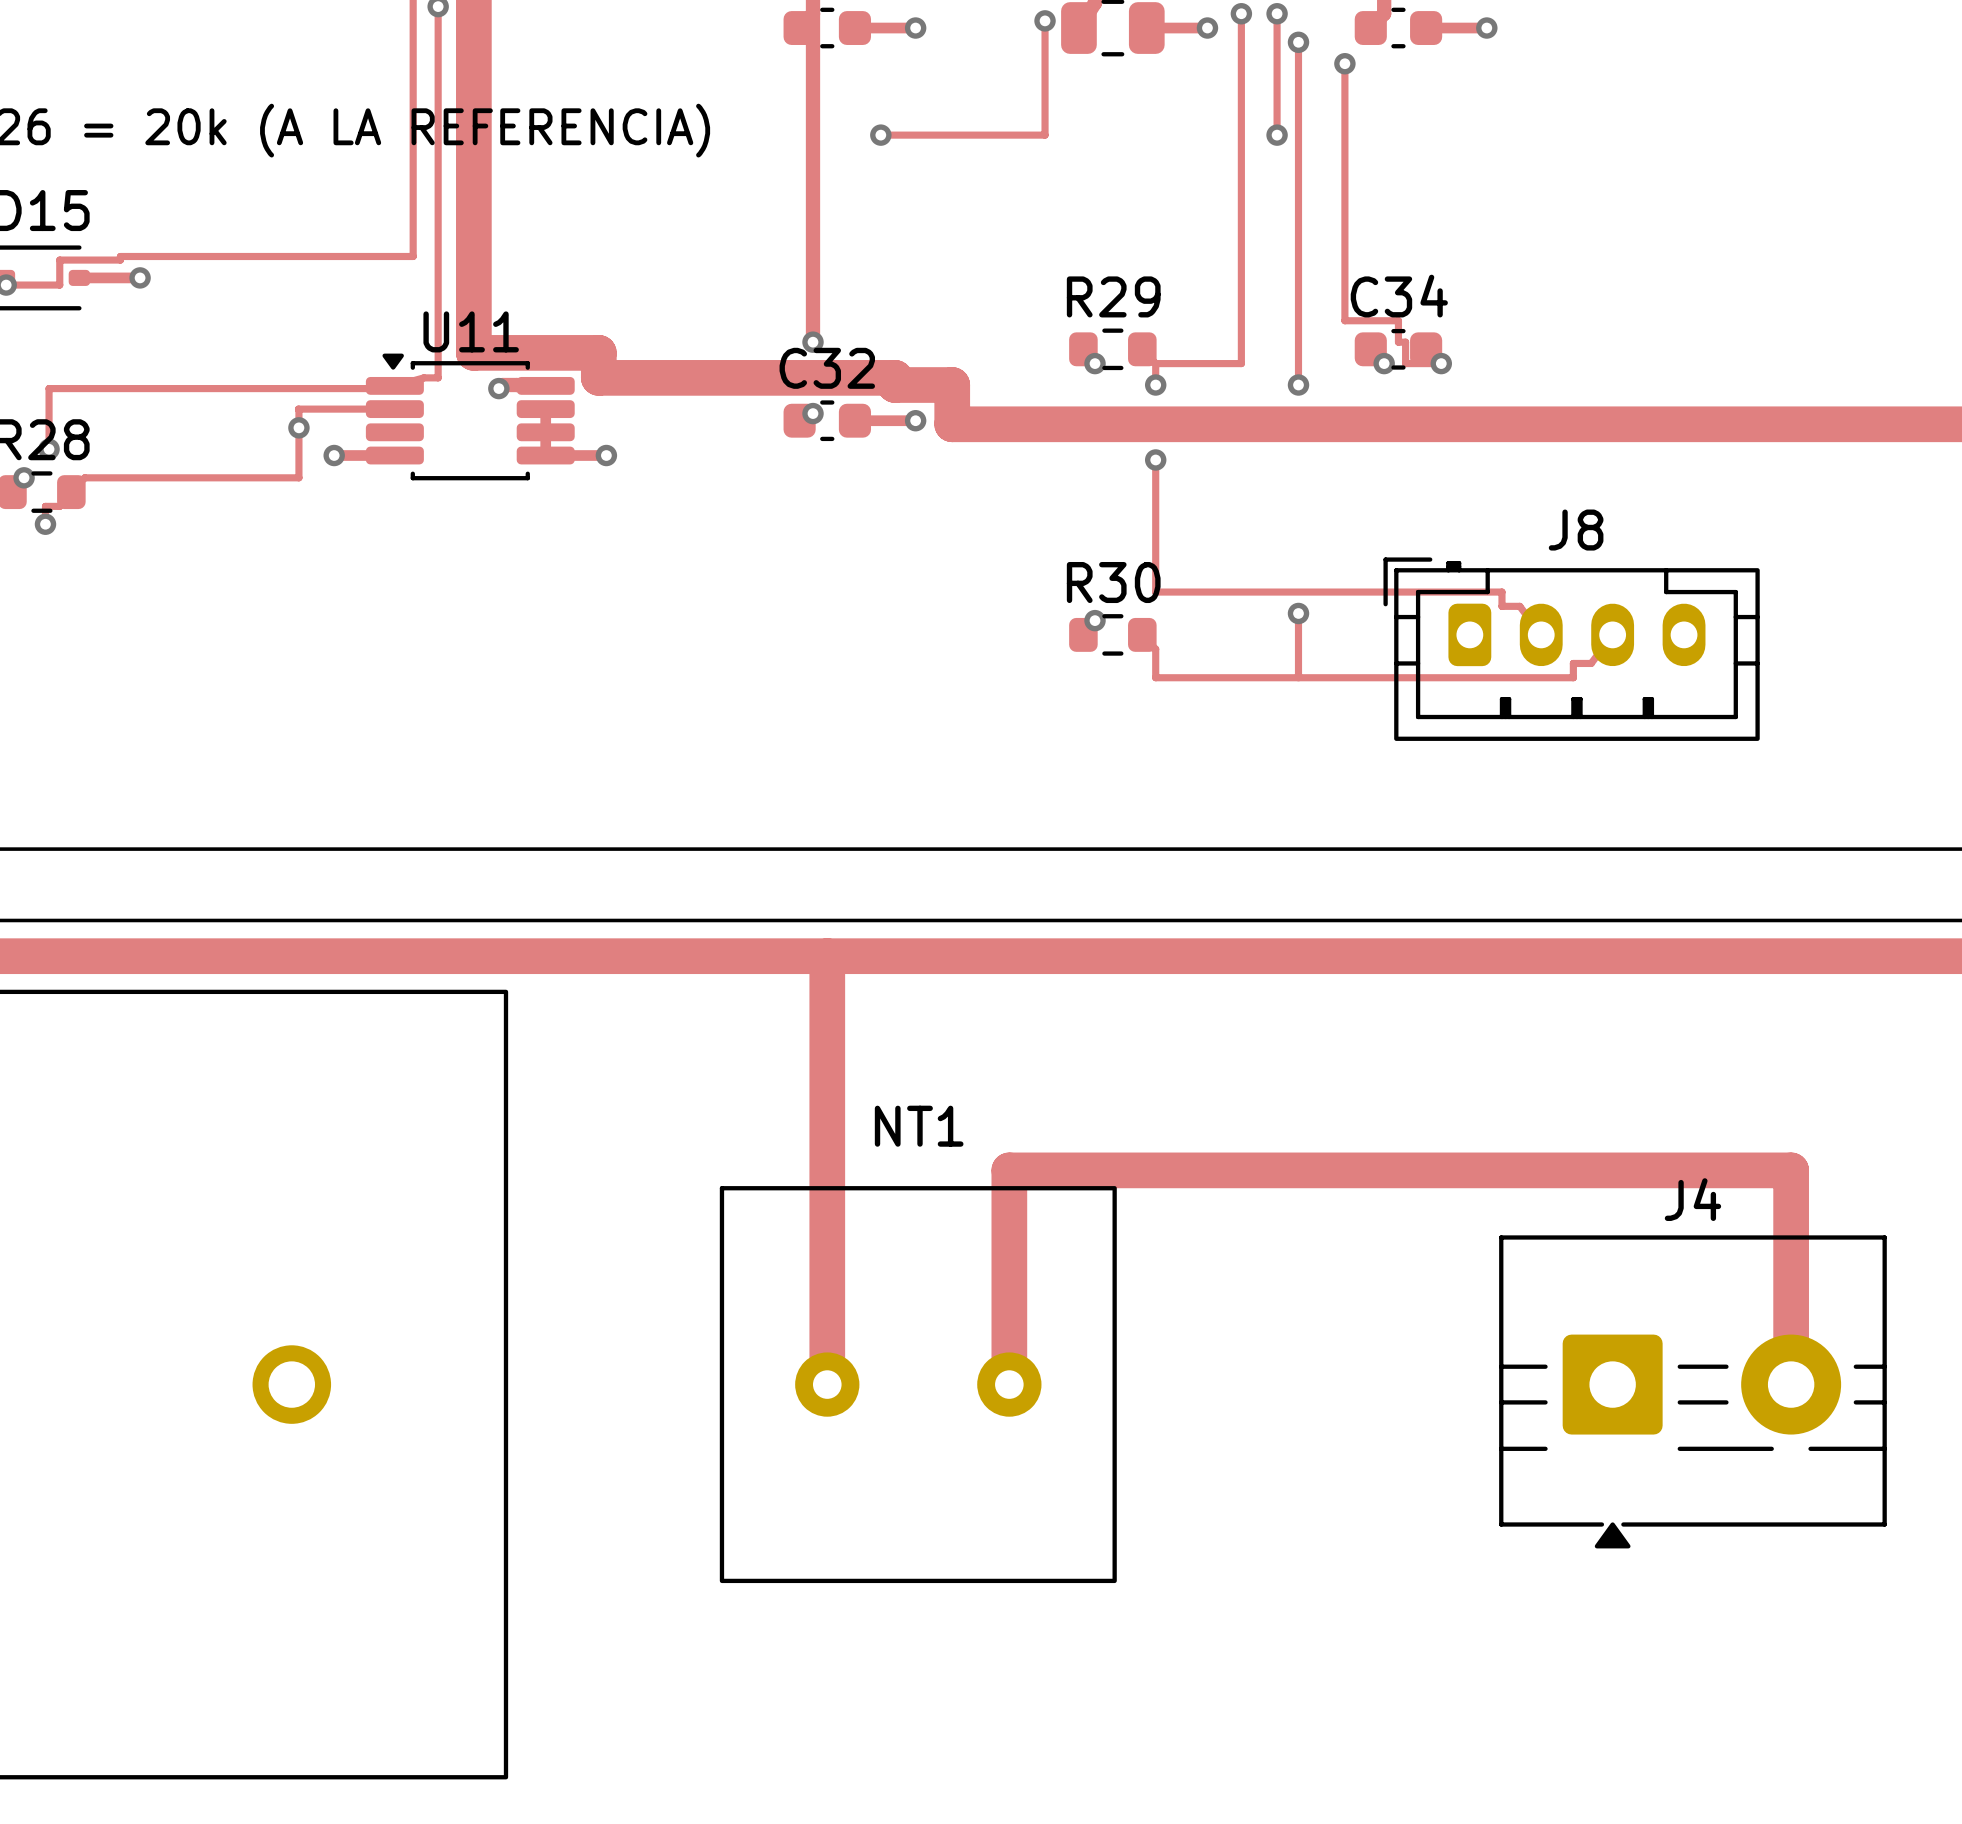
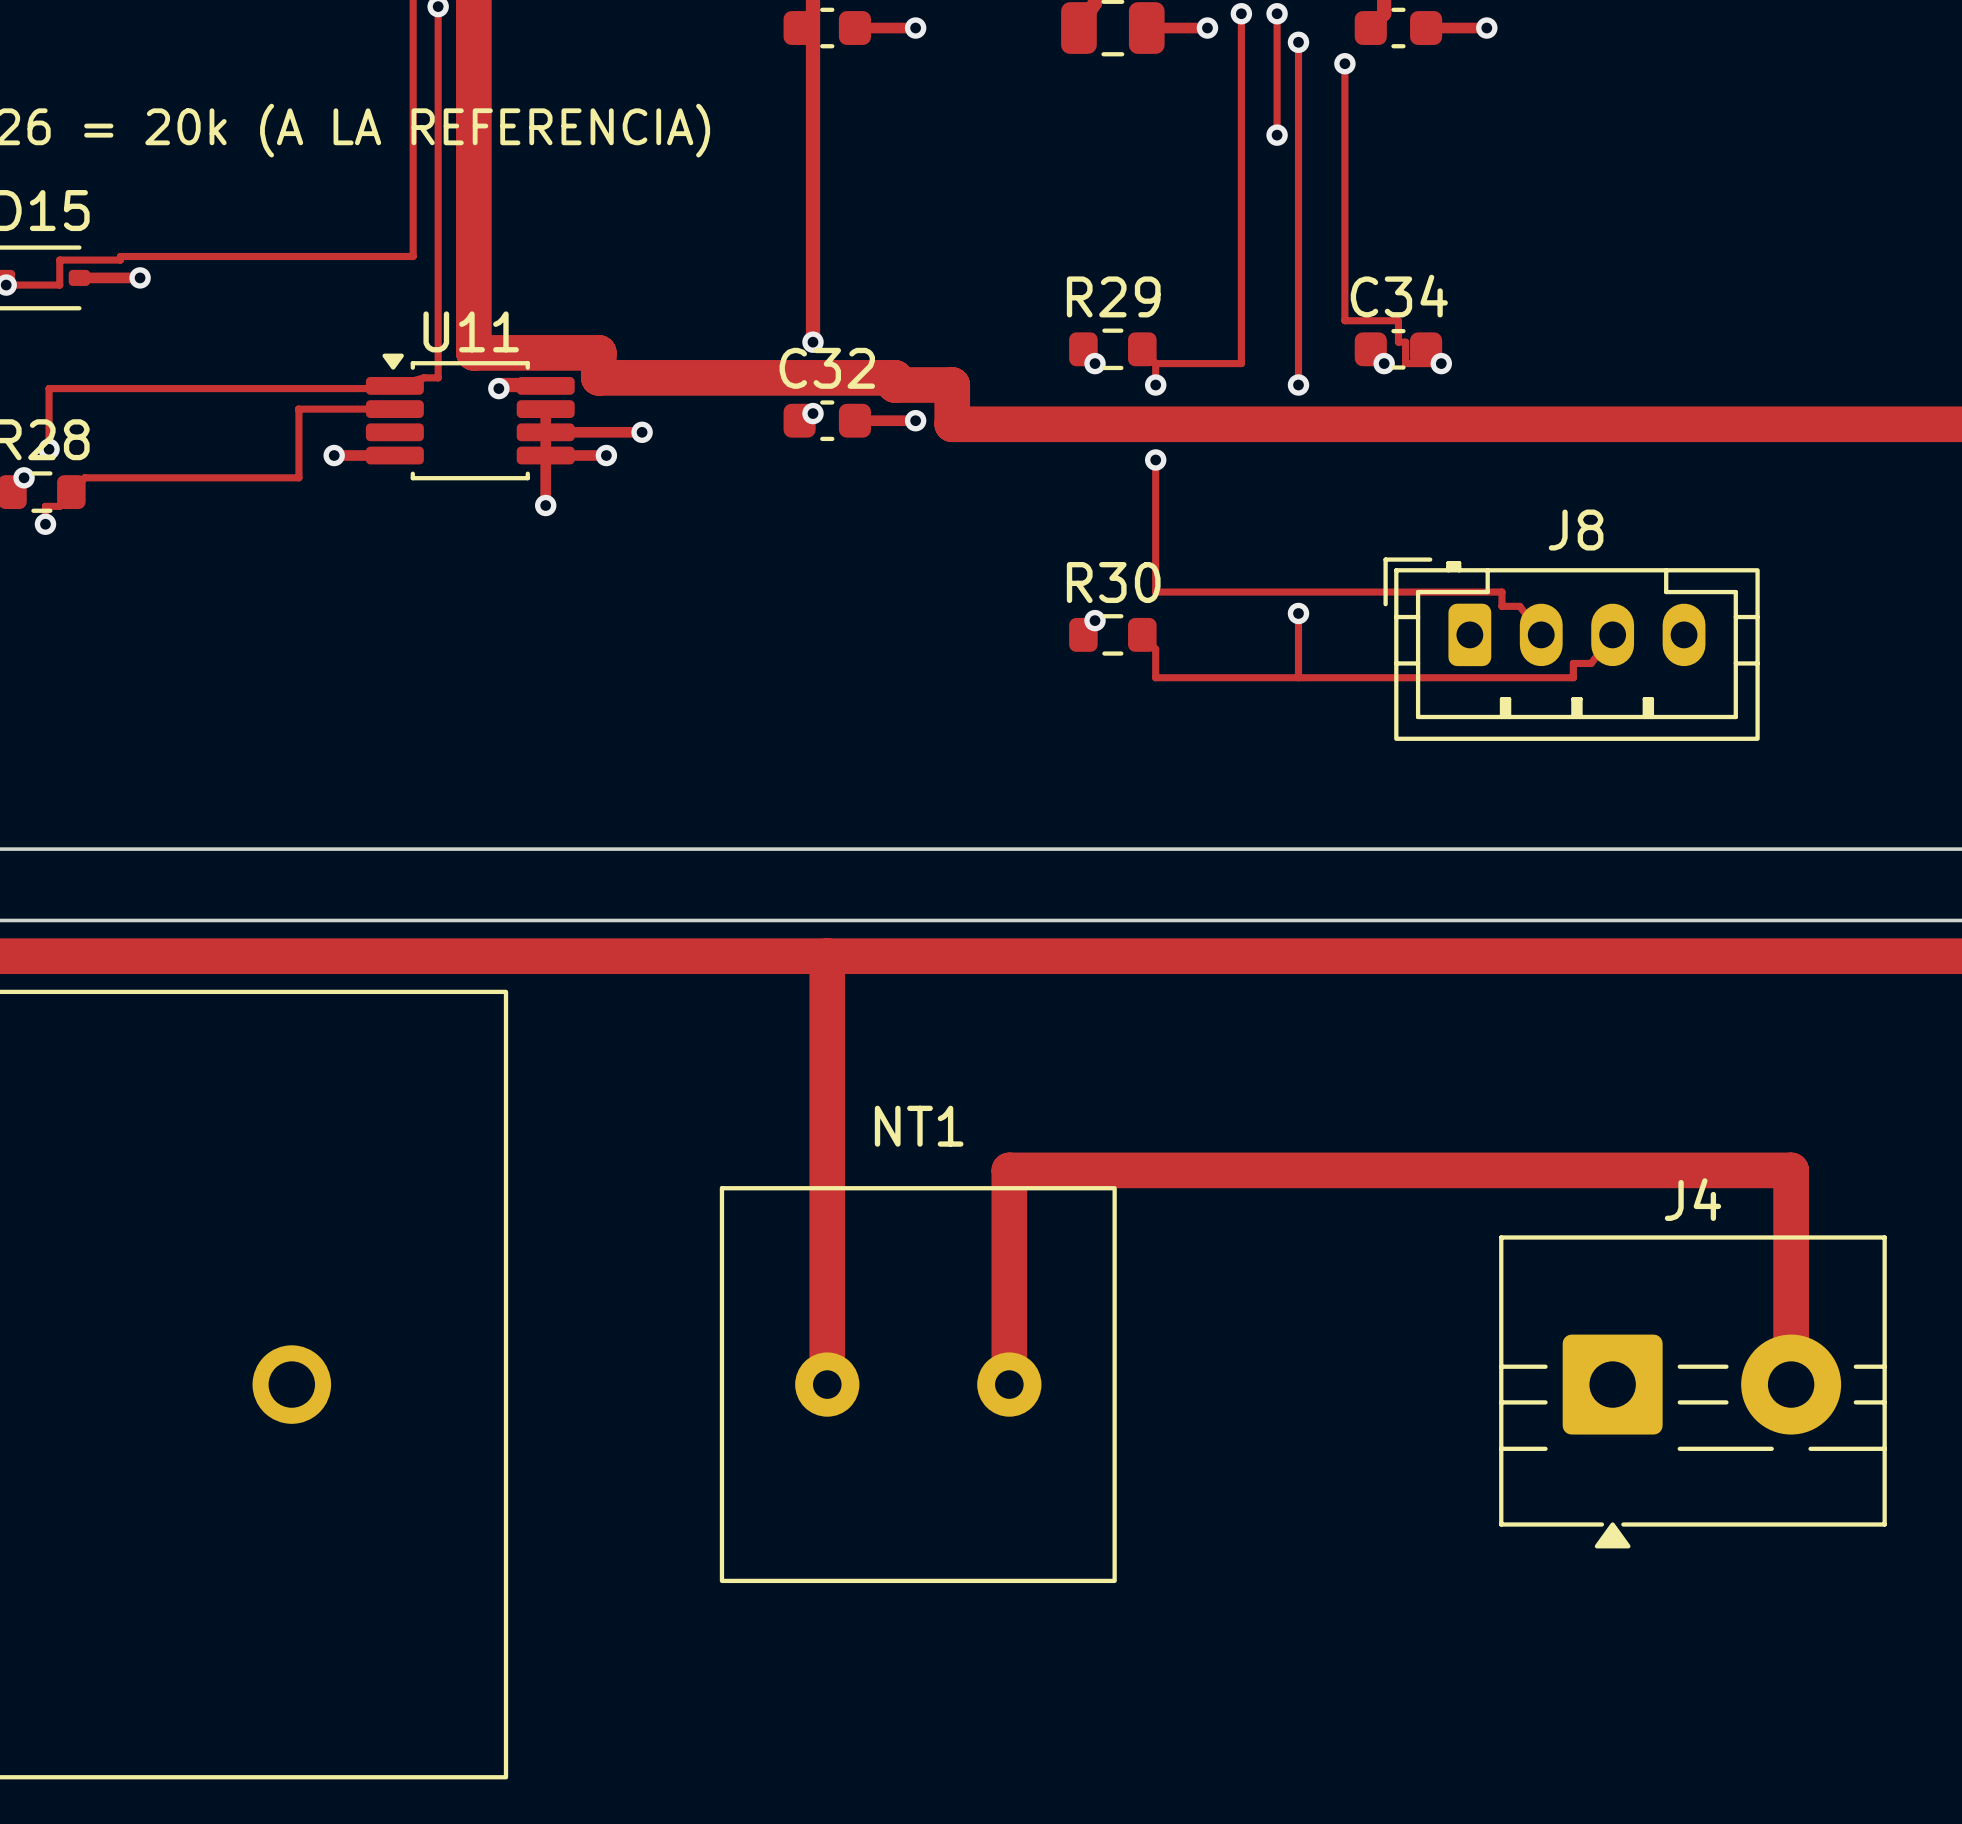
track: (1045, 20) (1045, 135) (880, 135) -> none
via: (1045, 20) -> none
via: (880, 135) -> none
via: (298, 427) -> none
track: none -> (545, 432) (642, 432)
via: none -> (642, 432)
track: none -> (545, 455) (545, 505)
via: none -> (545, 505)

